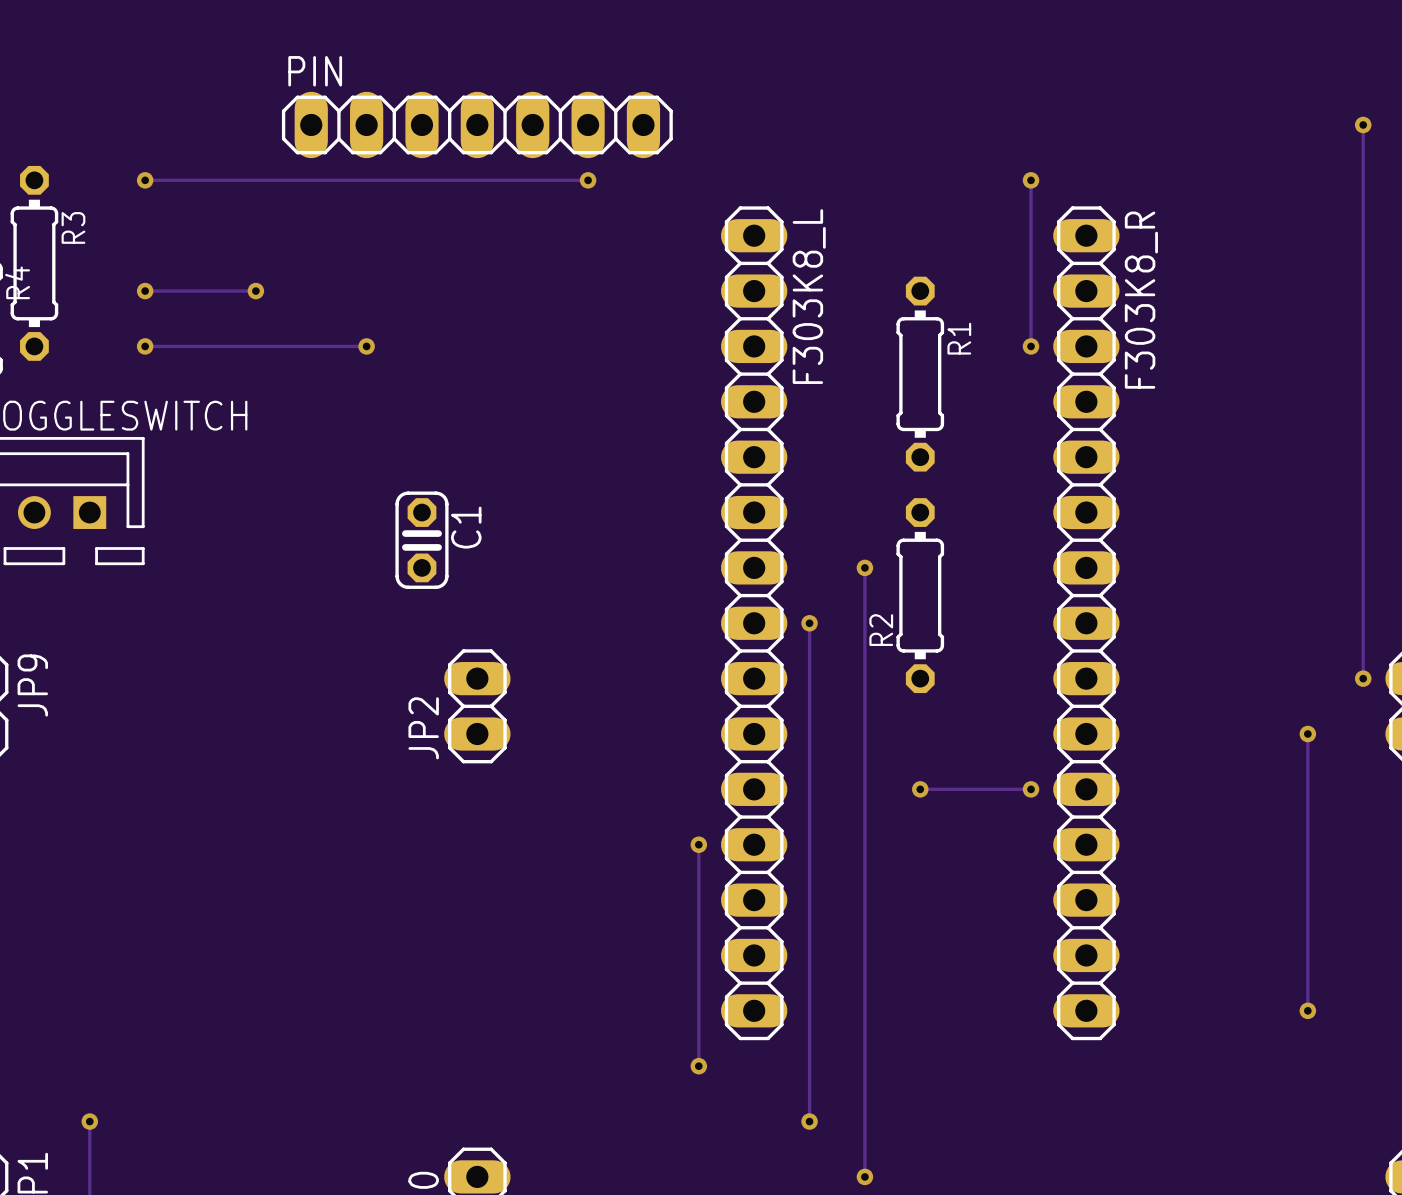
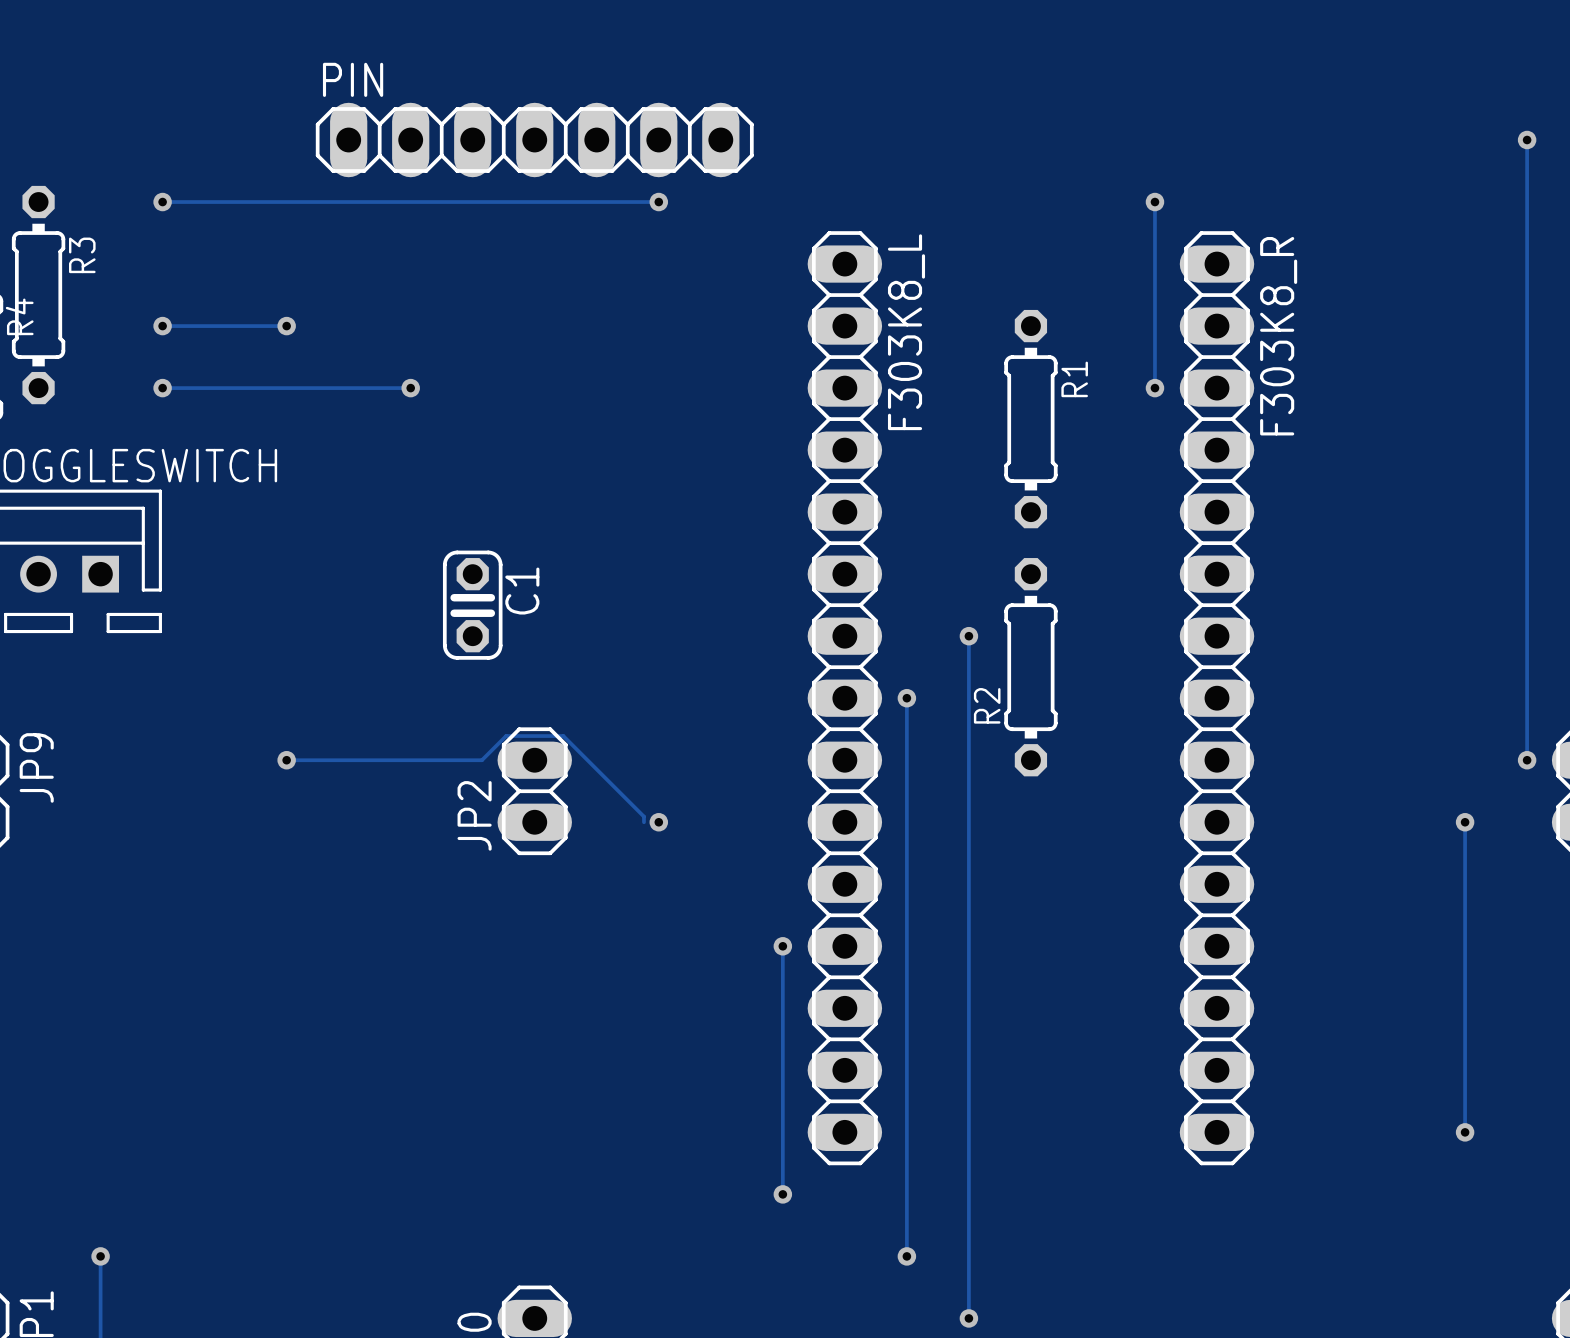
track: none -> (286, 760) (481, 760) (506, 736) (563, 736) (643, 816) (643, 822)
via: none -> (286, 760)
via: none -> (658, 822)
track: (920, 789) (1031, 789) -> none
via: (920, 789) -> none
via: (1031, 789) -> none

